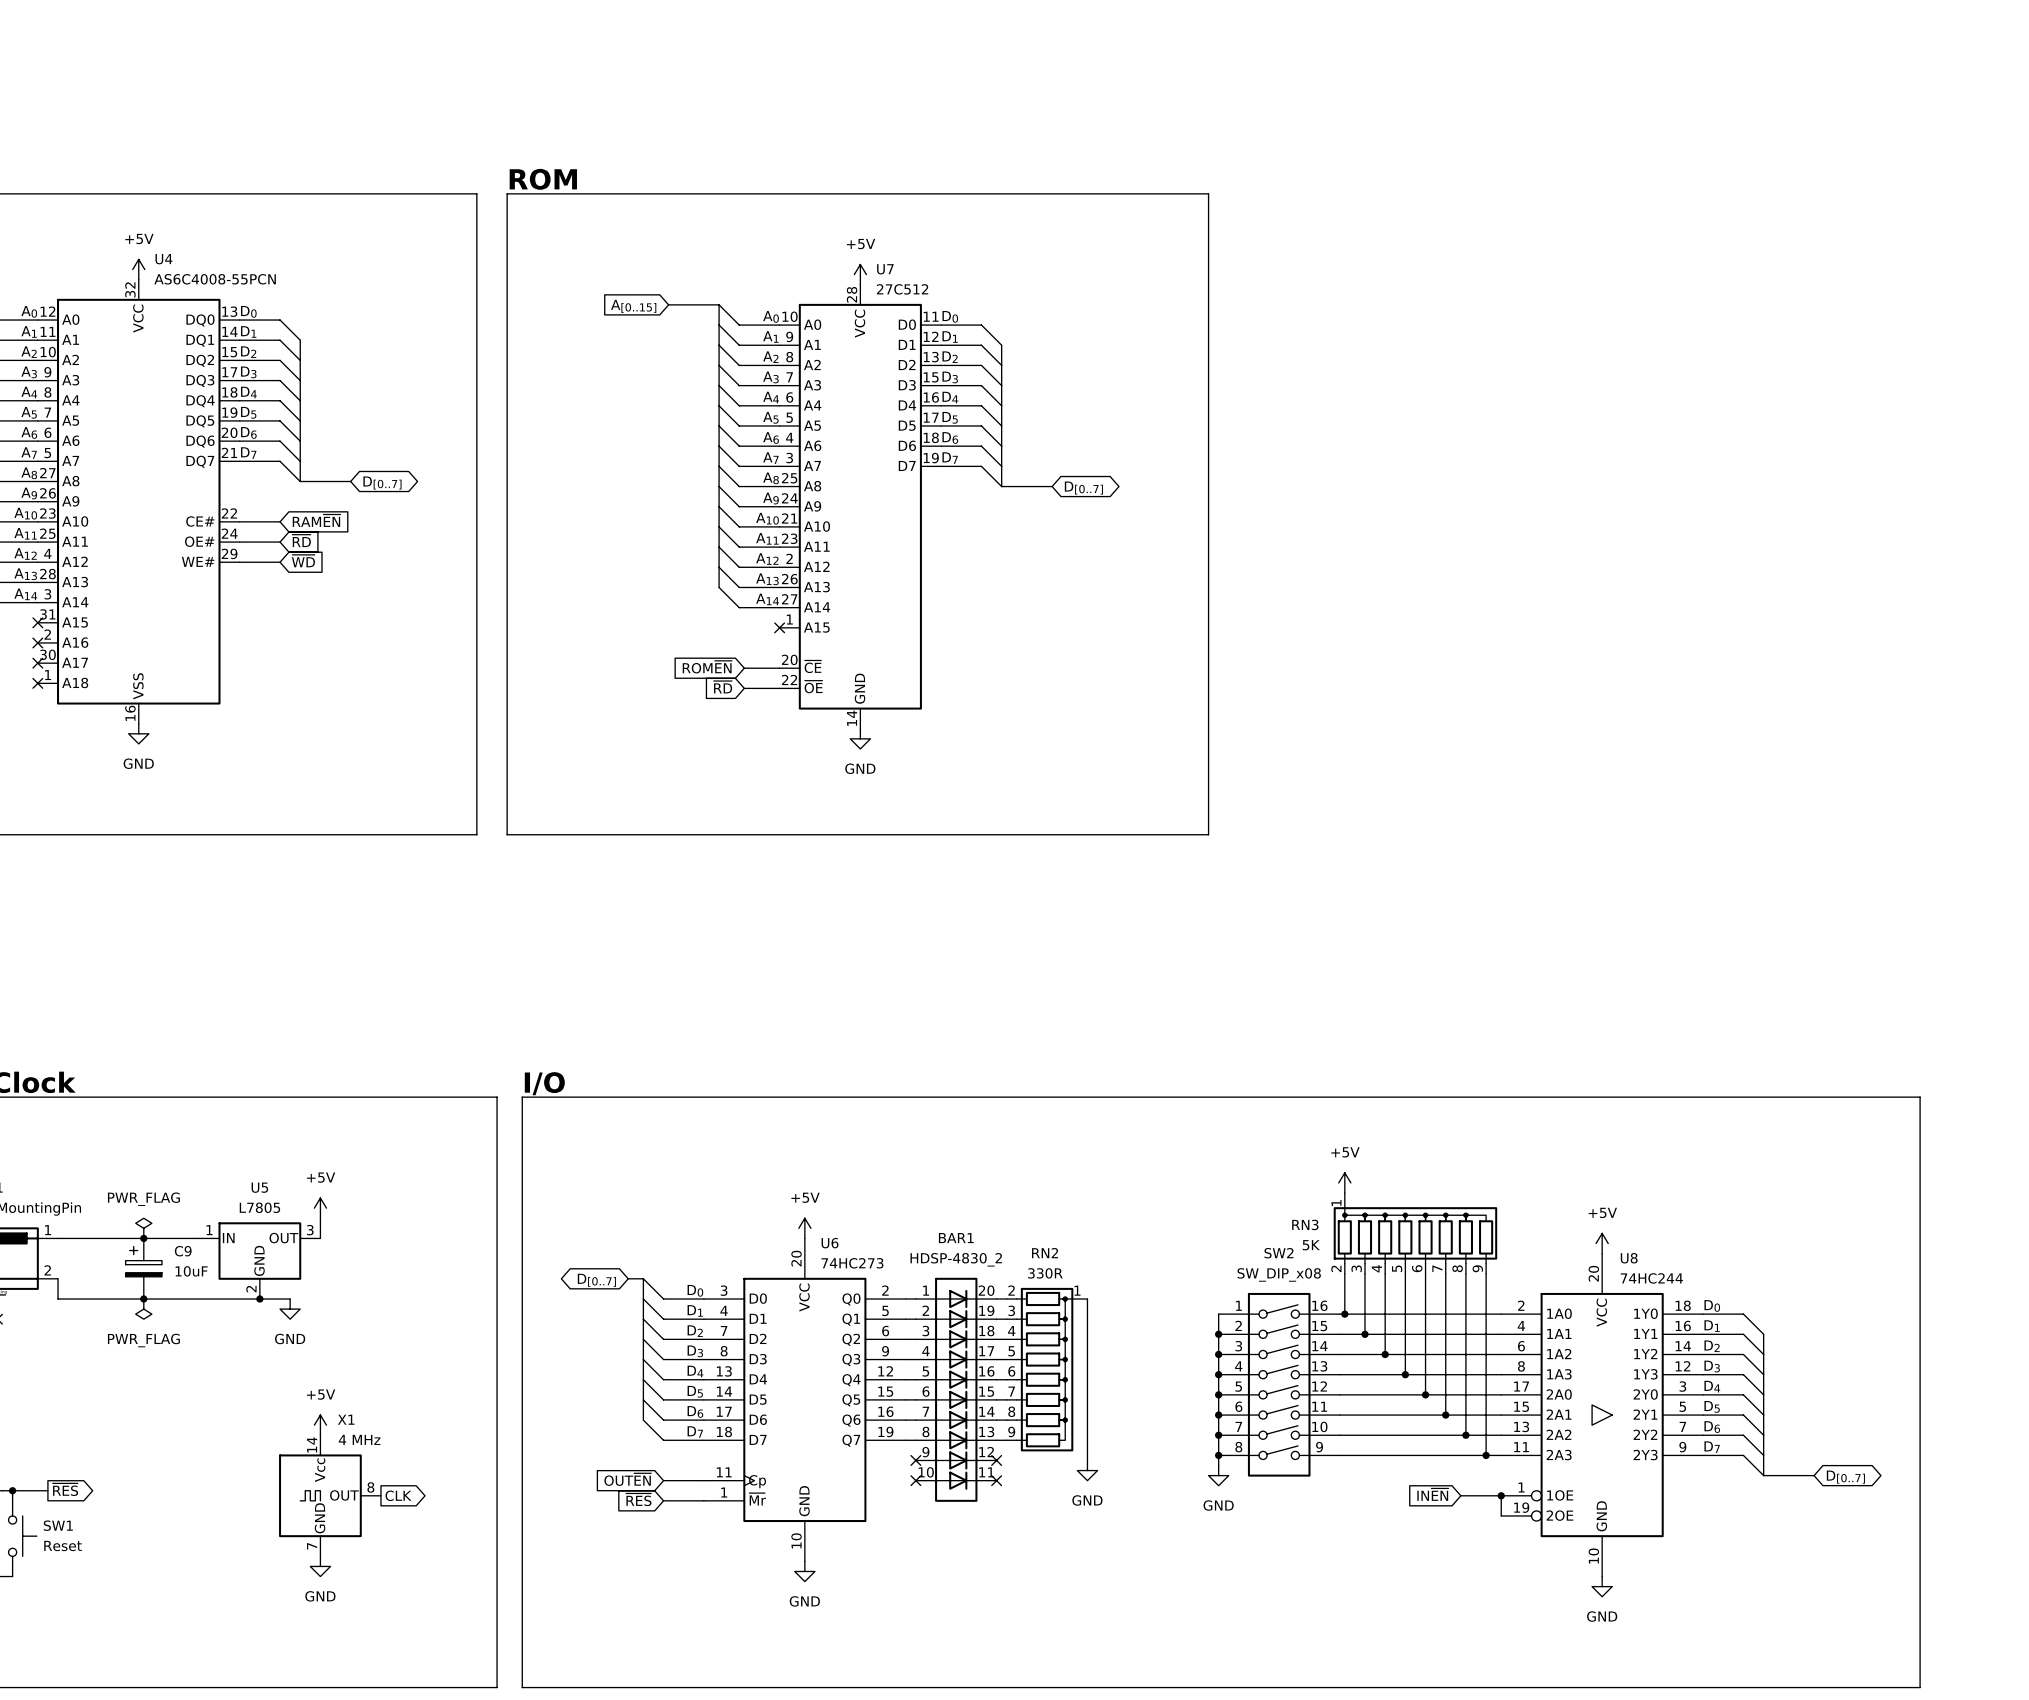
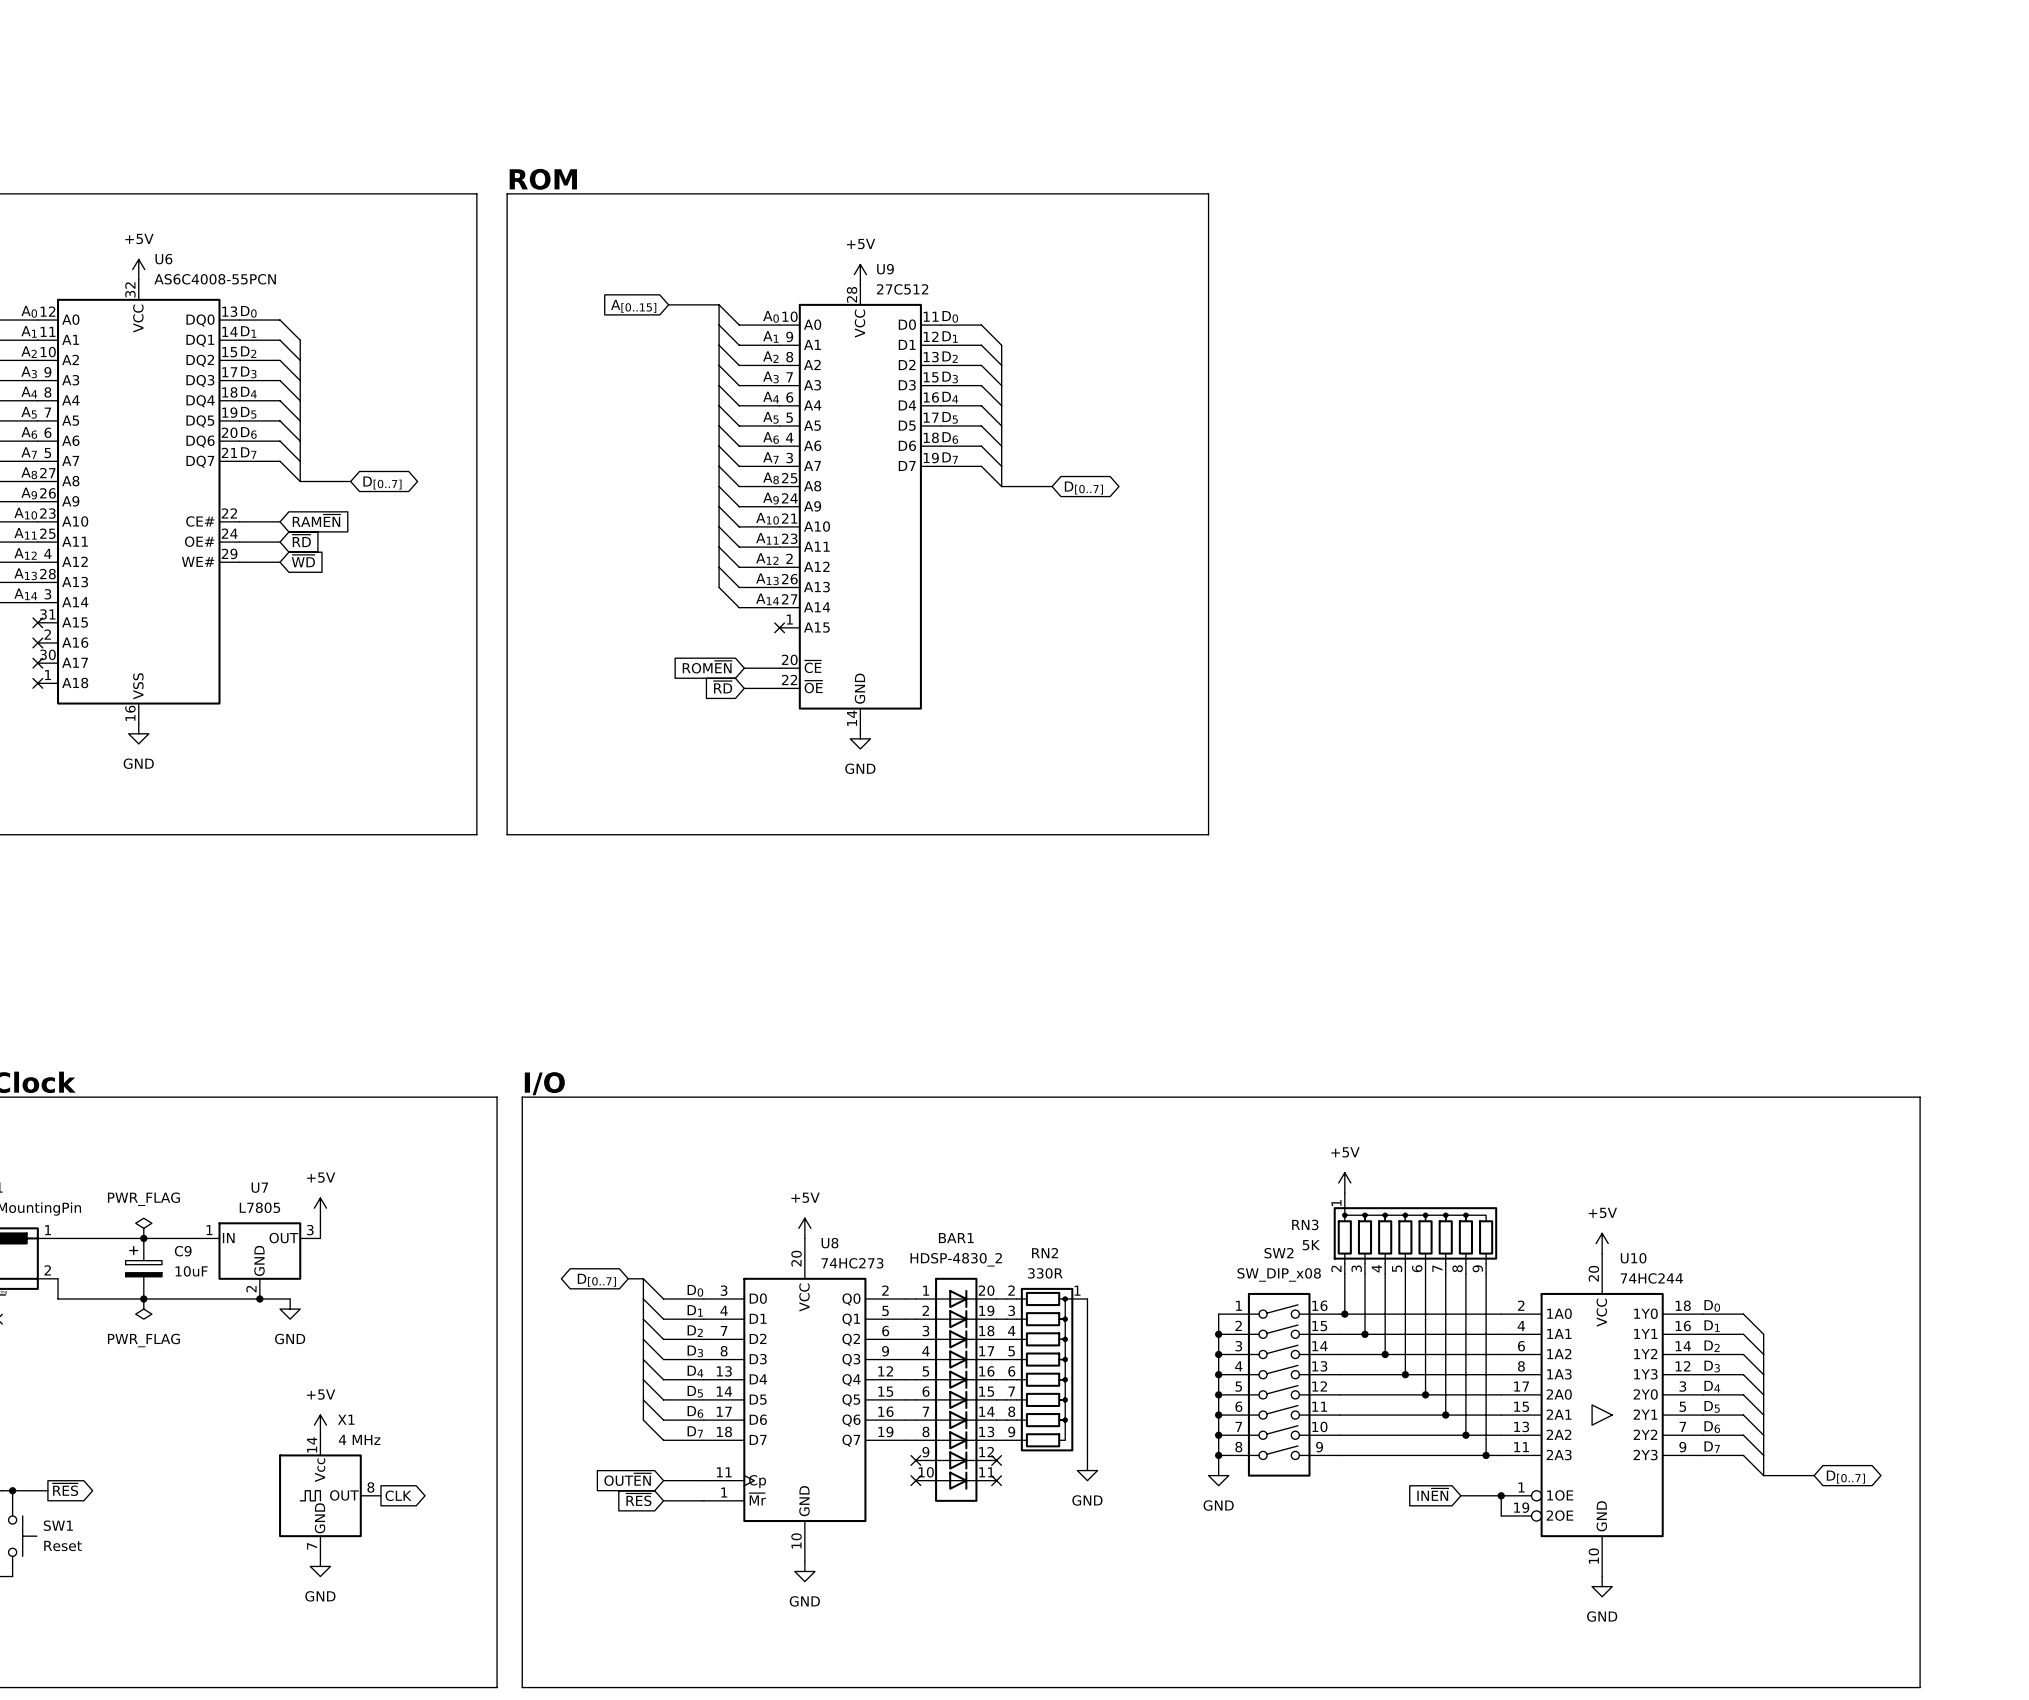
U4 name: U4 (163, 259) -> U6 (163, 259)
U7 name: U7 (885, 269) -> U9 (885, 269)
U5 name: U5 (259, 1187) -> U7 (259, 1187)
U6 name: U6 (830, 1243) -> U8 (830, 1243)
U8 name: U8 (1629, 1258) -> U10 (1633, 1258)

